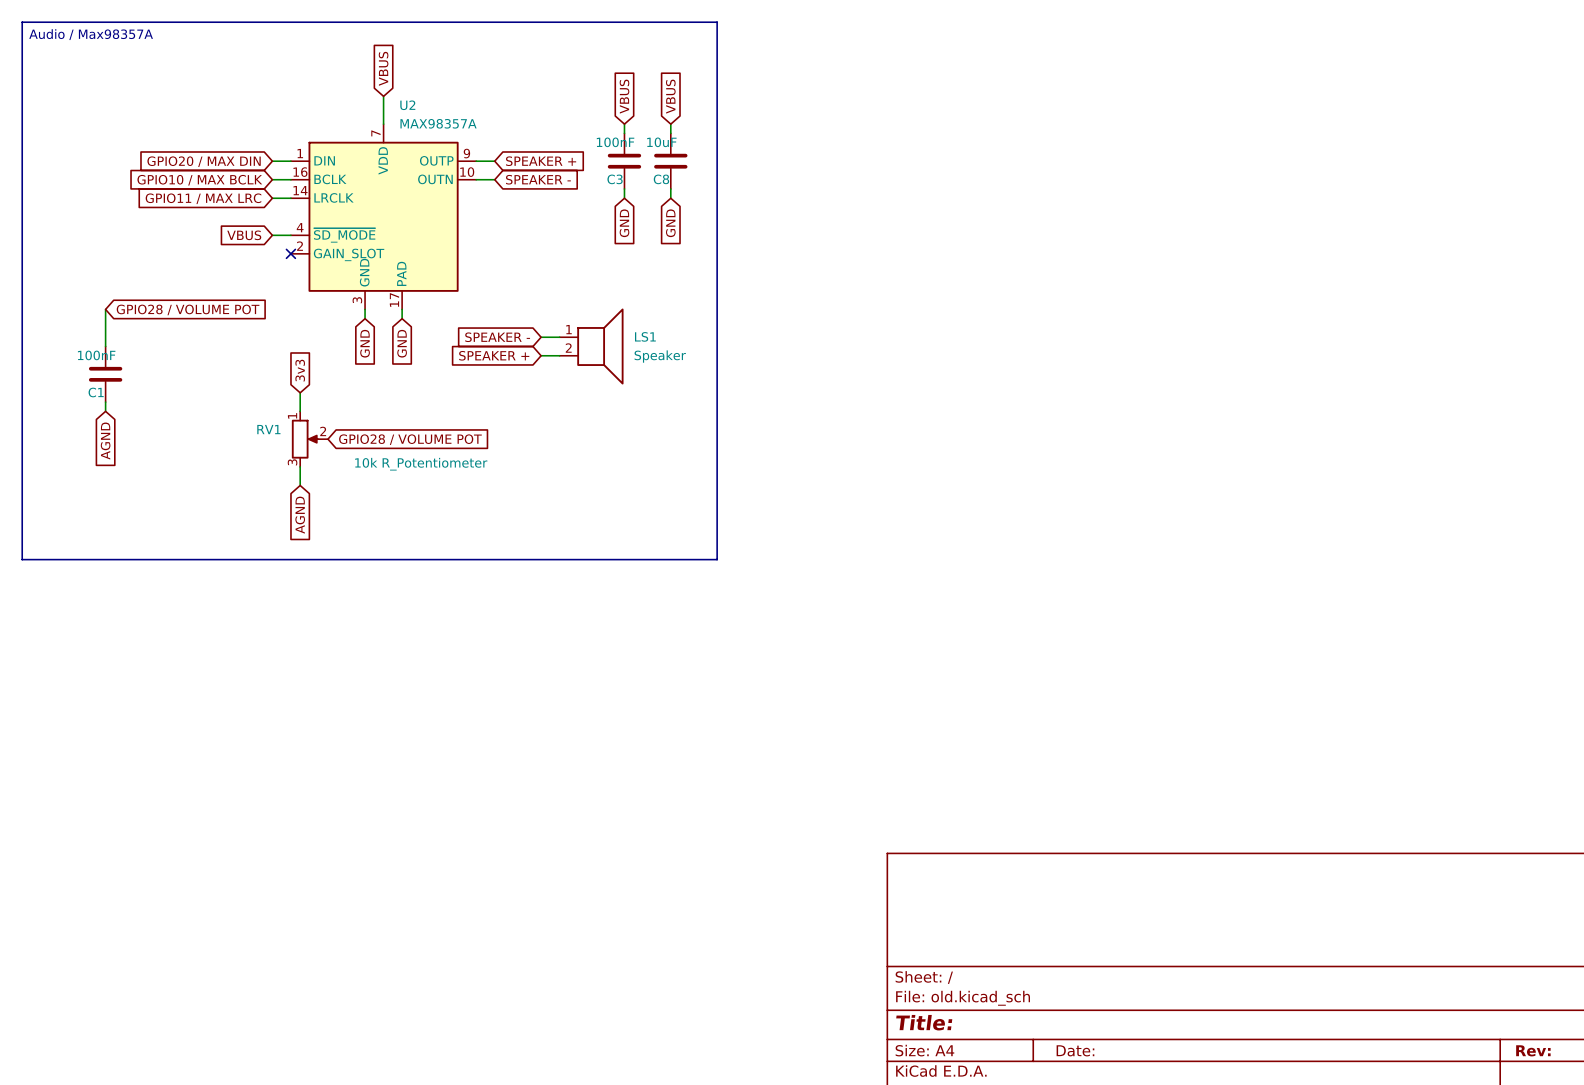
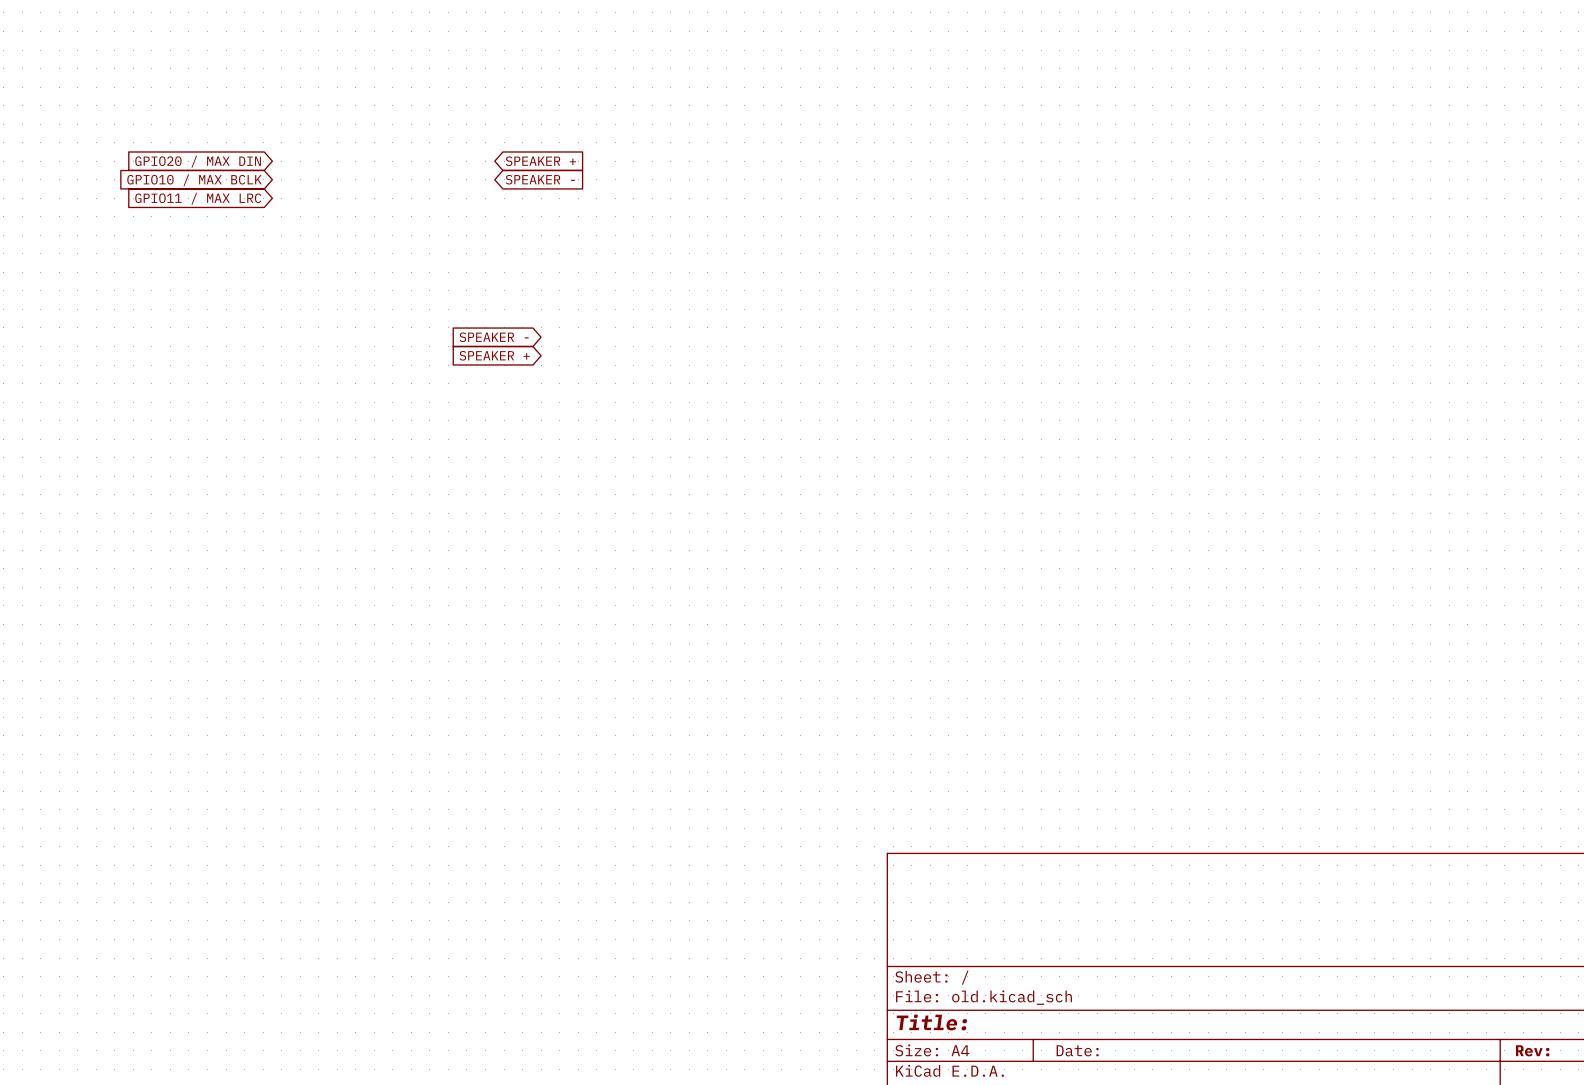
line: (22, 22) (717, 22) (717, 559) (22, 559) (22, 22) -> none
text: Audio / Max98357A (91, 34) -> none
global label: VBUS (383, 68) -> none
wire: (383, 96) (383, 124) -> none
global label: VBUS (624, 96) -> none
global label: VBUS (670, 96) -> none
wire: (624, 124) (624, 133) -> none
wire: (670, 124) (670, 133) -> none
wire: (272, 161) (290, 161) -> none
wire: (476, 161) (494, 161) -> none
C3: 100nF (624, 161) -> none
C8: 10uF (670, 161) -> none
wire: (272, 179) (290, 179) -> none
wire: (476, 179) (494, 179) -> none
wire: (624, 188) (624, 198) -> none
wire: (670, 188) (670, 198) -> none
wire: (272, 198) (290, 198) -> none
U2: MAX98357A (383, 216) -> none
global label: GND (624, 223) -> none
global label: GND (670, 223) -> none
global label: VBUS (244, 235) -> none
wire: (272, 235) (290, 235) -> none
no-connect mark: (290, 253) -> none
wire: (105, 309) (105, 346) -> none
global label: GPIO28 / VOLUME POT (188, 309) -> none
wire: (365, 309) (365, 318) -> none
wire: (402, 309) (402, 318) -> none
wire: (541, 337) (559, 337) -> none
global label: GND (365, 343) -> none
global label: GND (402, 343) -> none
LS1: Speaker (591, 346) -> none
wire: (541, 355) (559, 355) -> none
global label: 3v3 (300, 370) -> none
C1: 100nF (105, 374) -> none
wire: (300, 392) (300, 411) -> none
wire: (105, 402) (105, 411) -> none
RV1: 10k R_Potentiometer (309, 439) -> none
global label: GPIO28 / VOLUME POT (410, 439) -> none
global label: AGND (105, 441) -> none
wire: (300, 466) (300, 485) -> none
global label: AGND (300, 515) -> none

